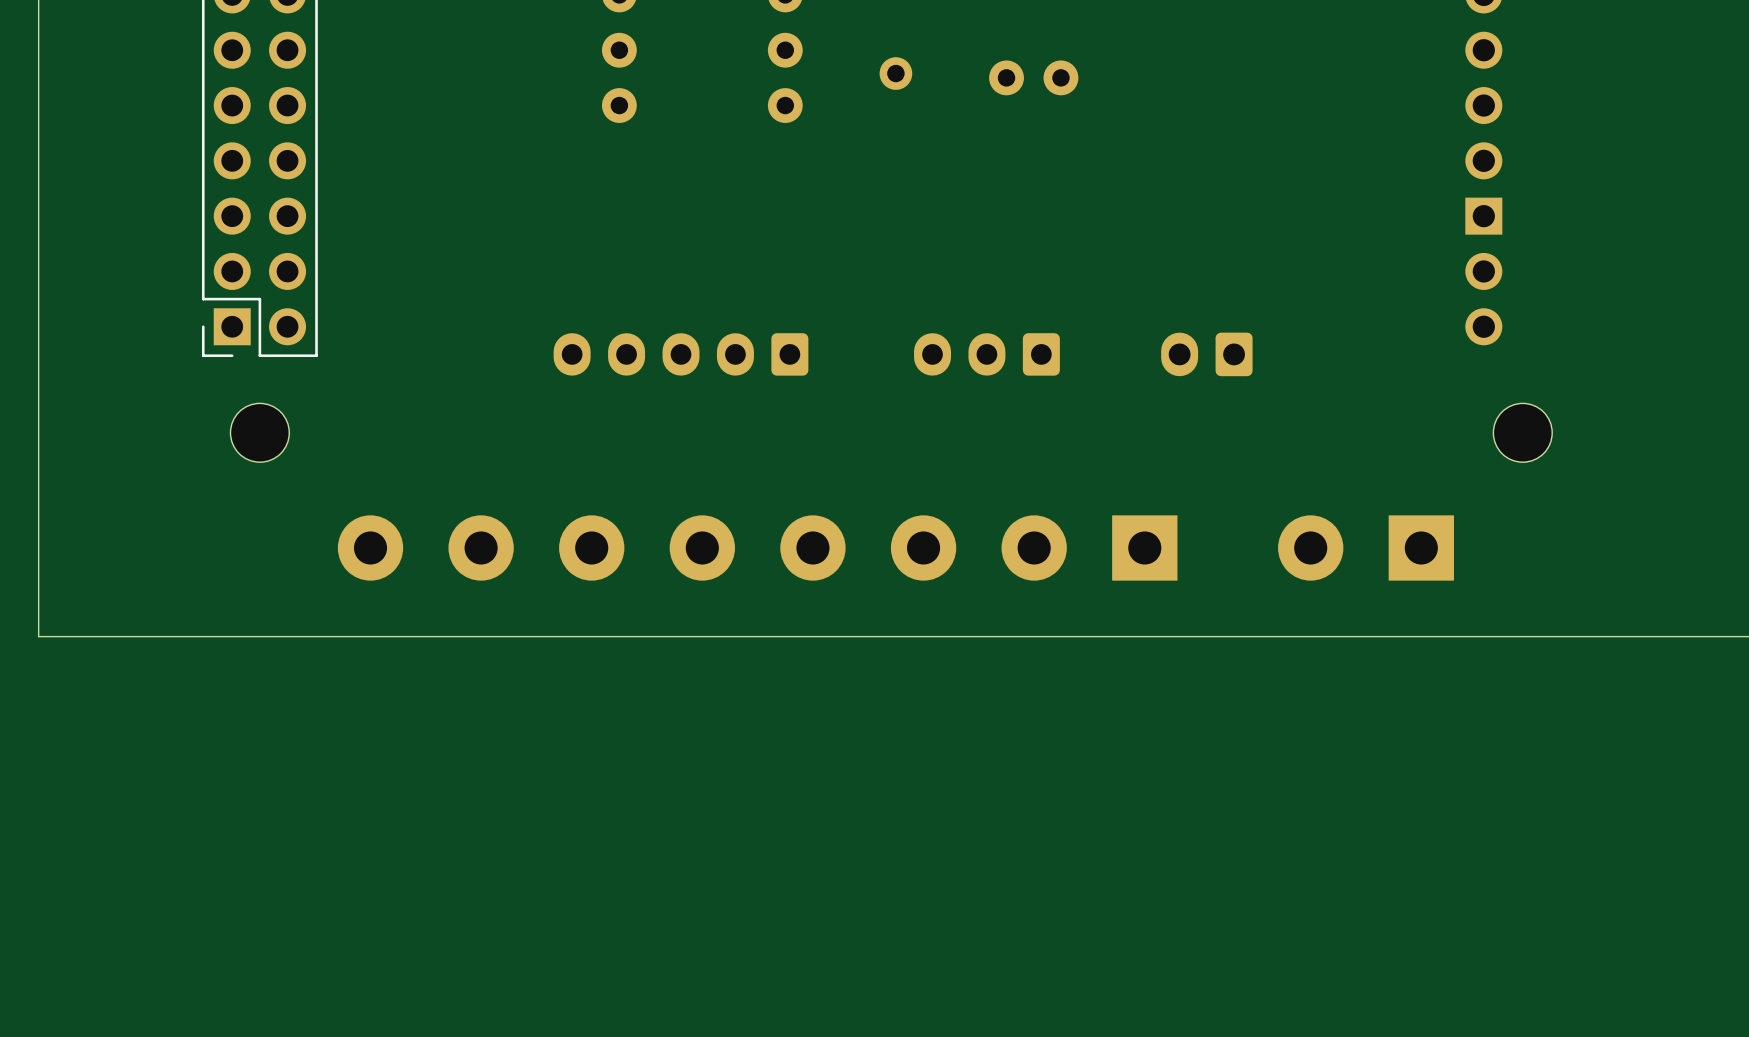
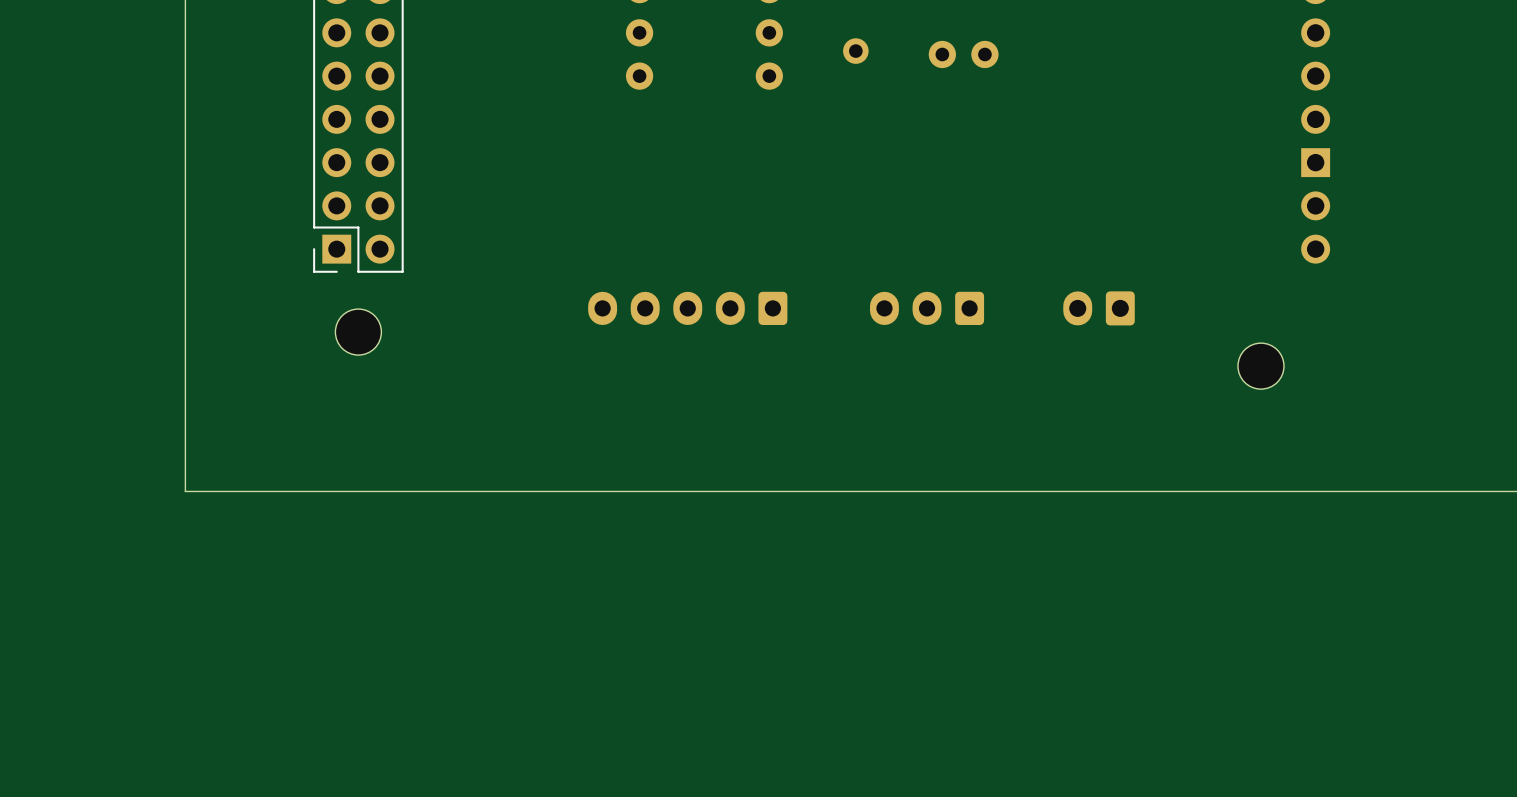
part position: (681, 354) -> (687, 308)
part position: (986, 354) -> (927, 308)
part position: (1206, 354) -> (1099, 308)
part position: (1522, 432) -> (1260, 366)
part: (757, 547) -> none
part: (1366, 547) -> none

